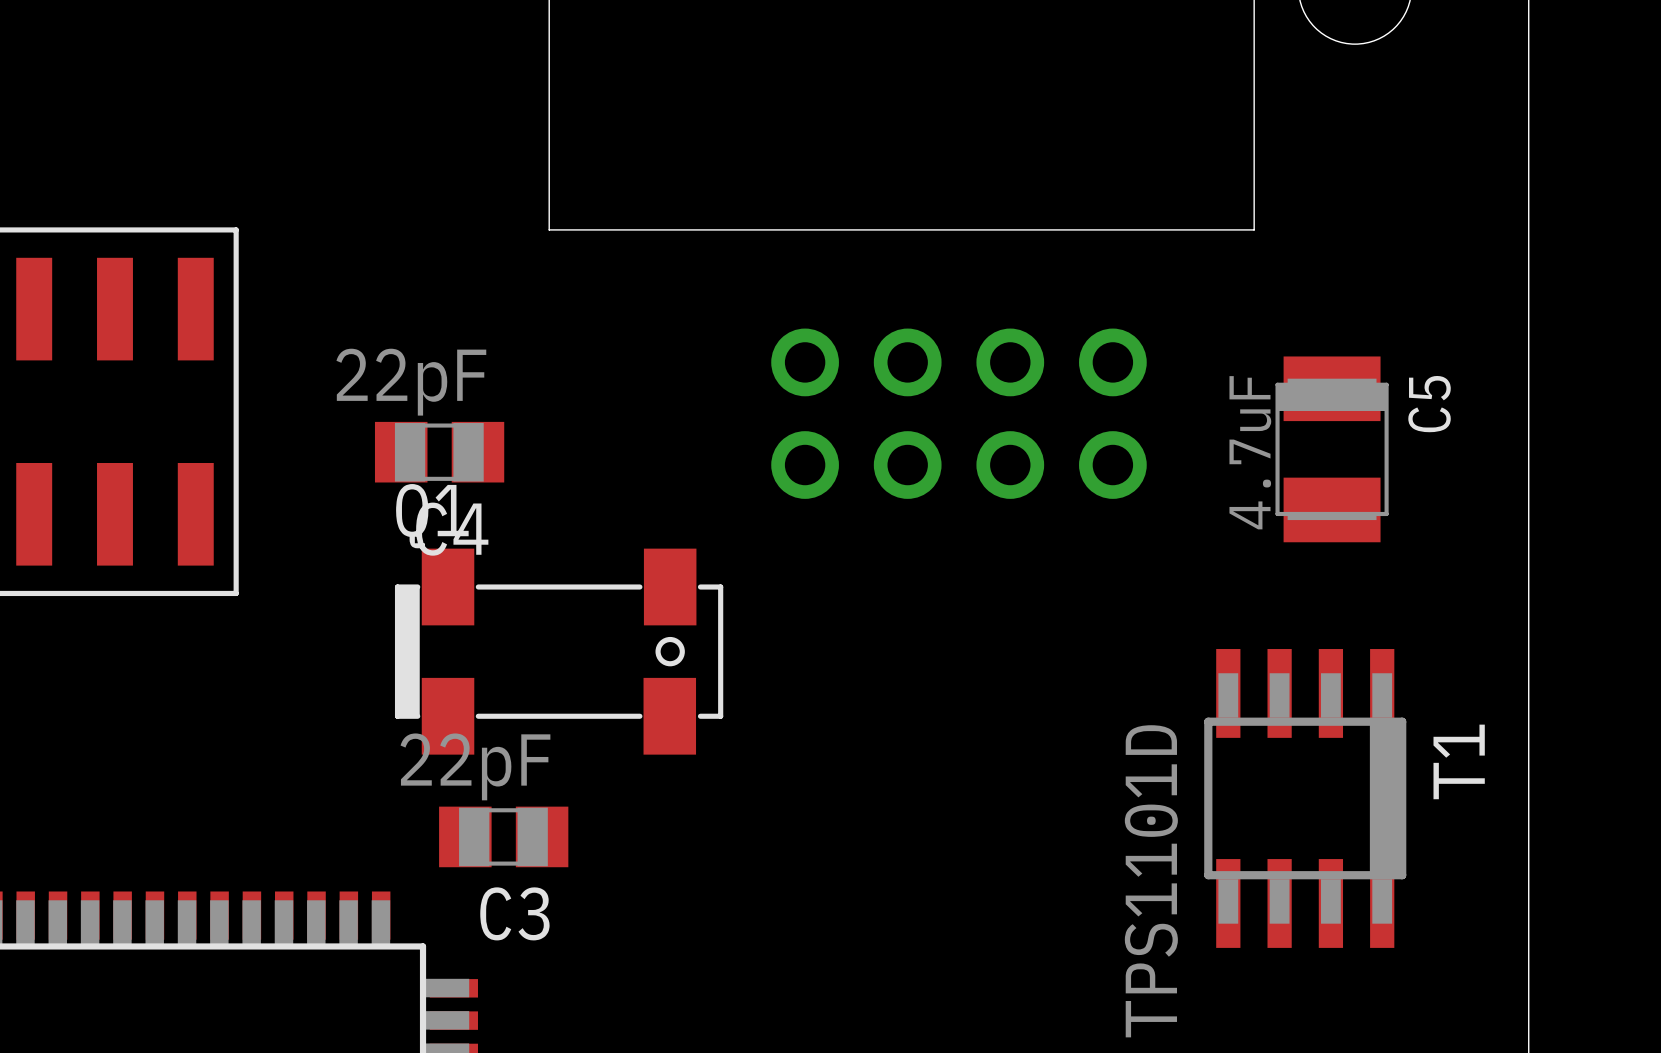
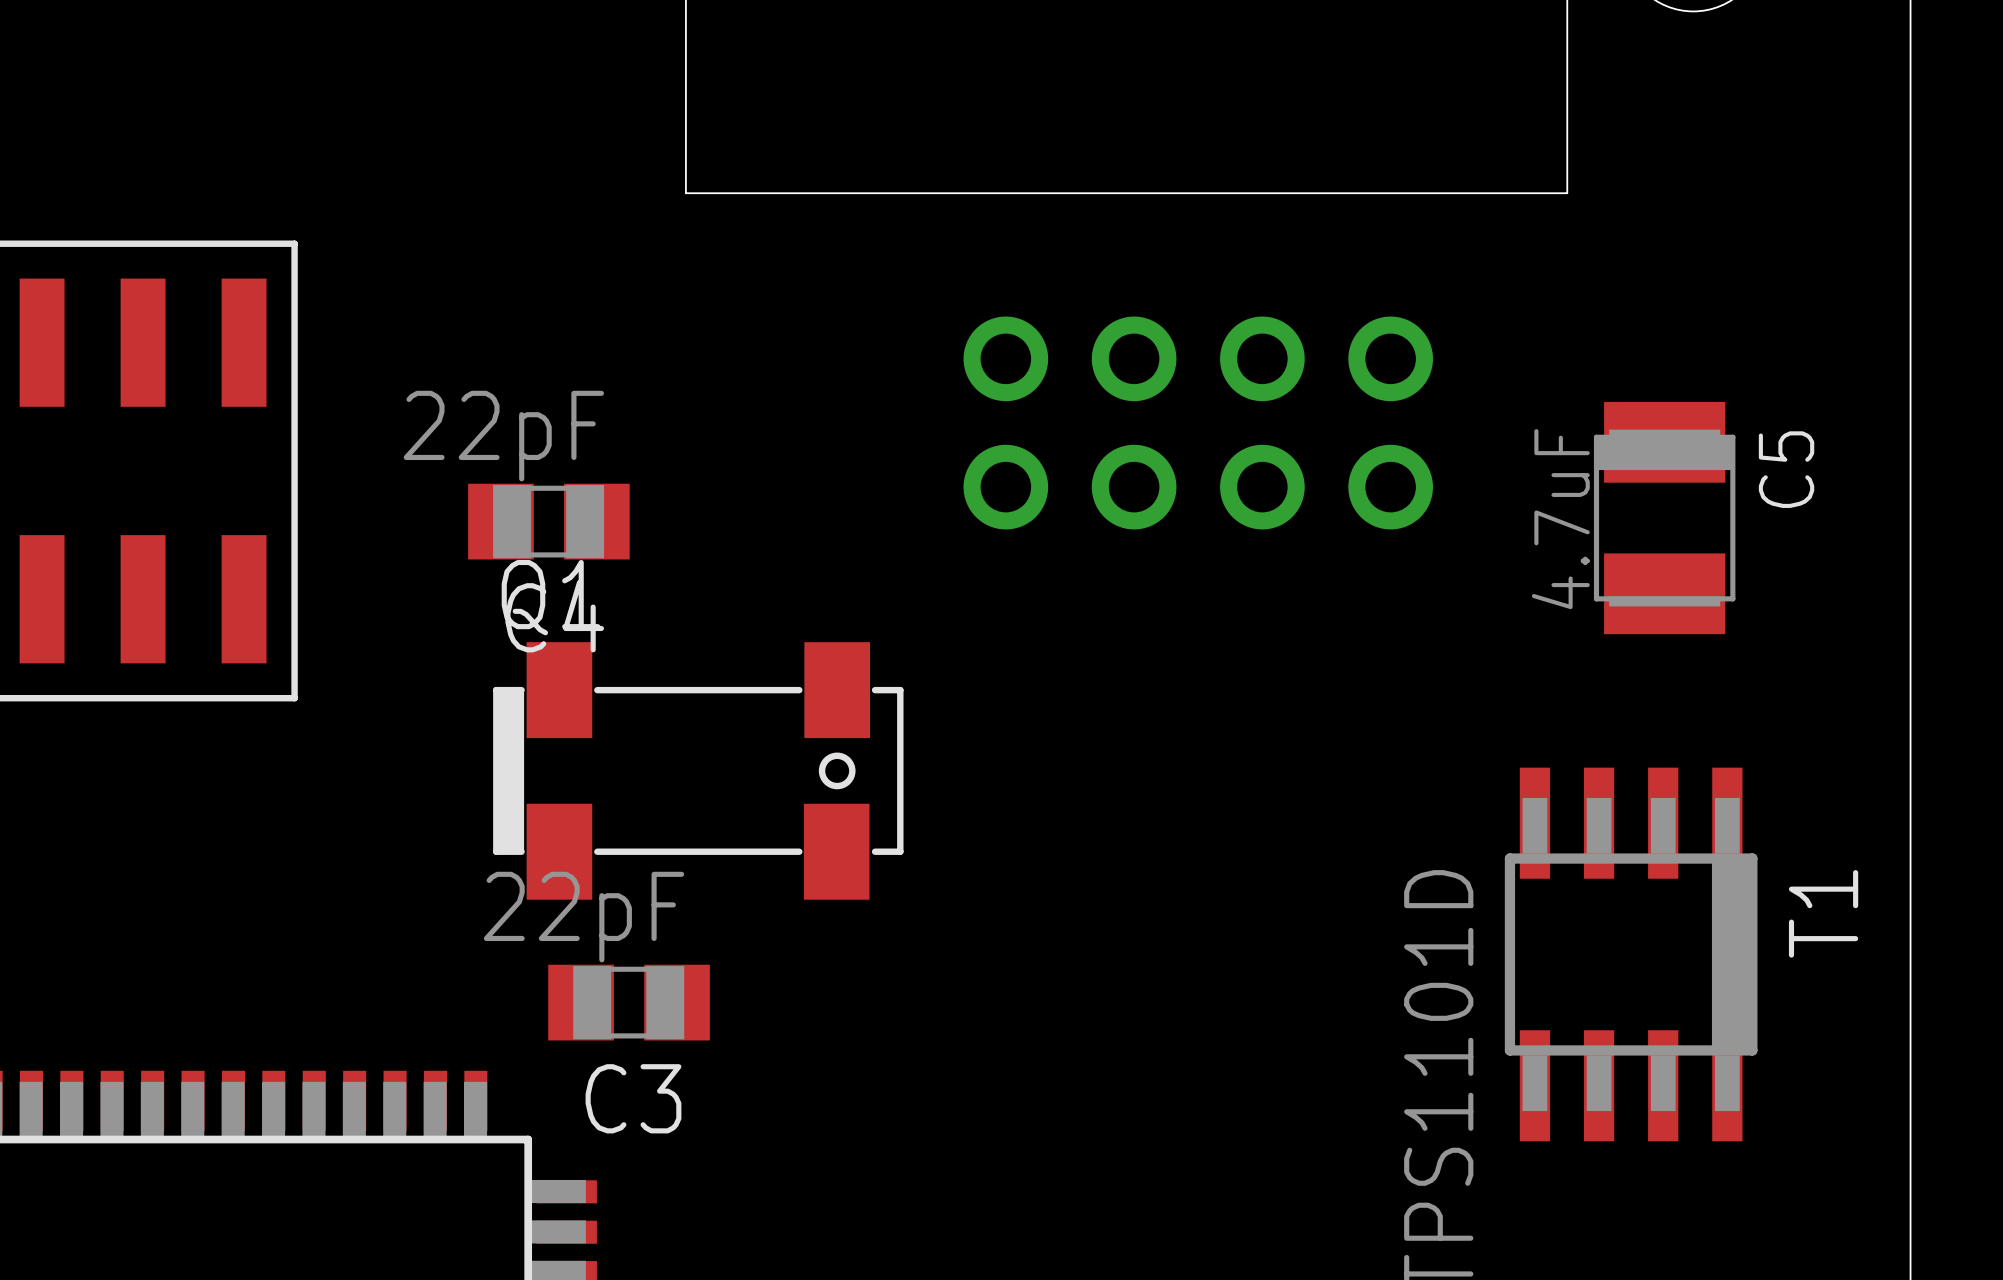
board edge: (549, 189) (549, 229) (1254, 229) (1254, 189) -> (685, 193) (1567, 193)
part position: (958, 413) -> (1198, 422)

